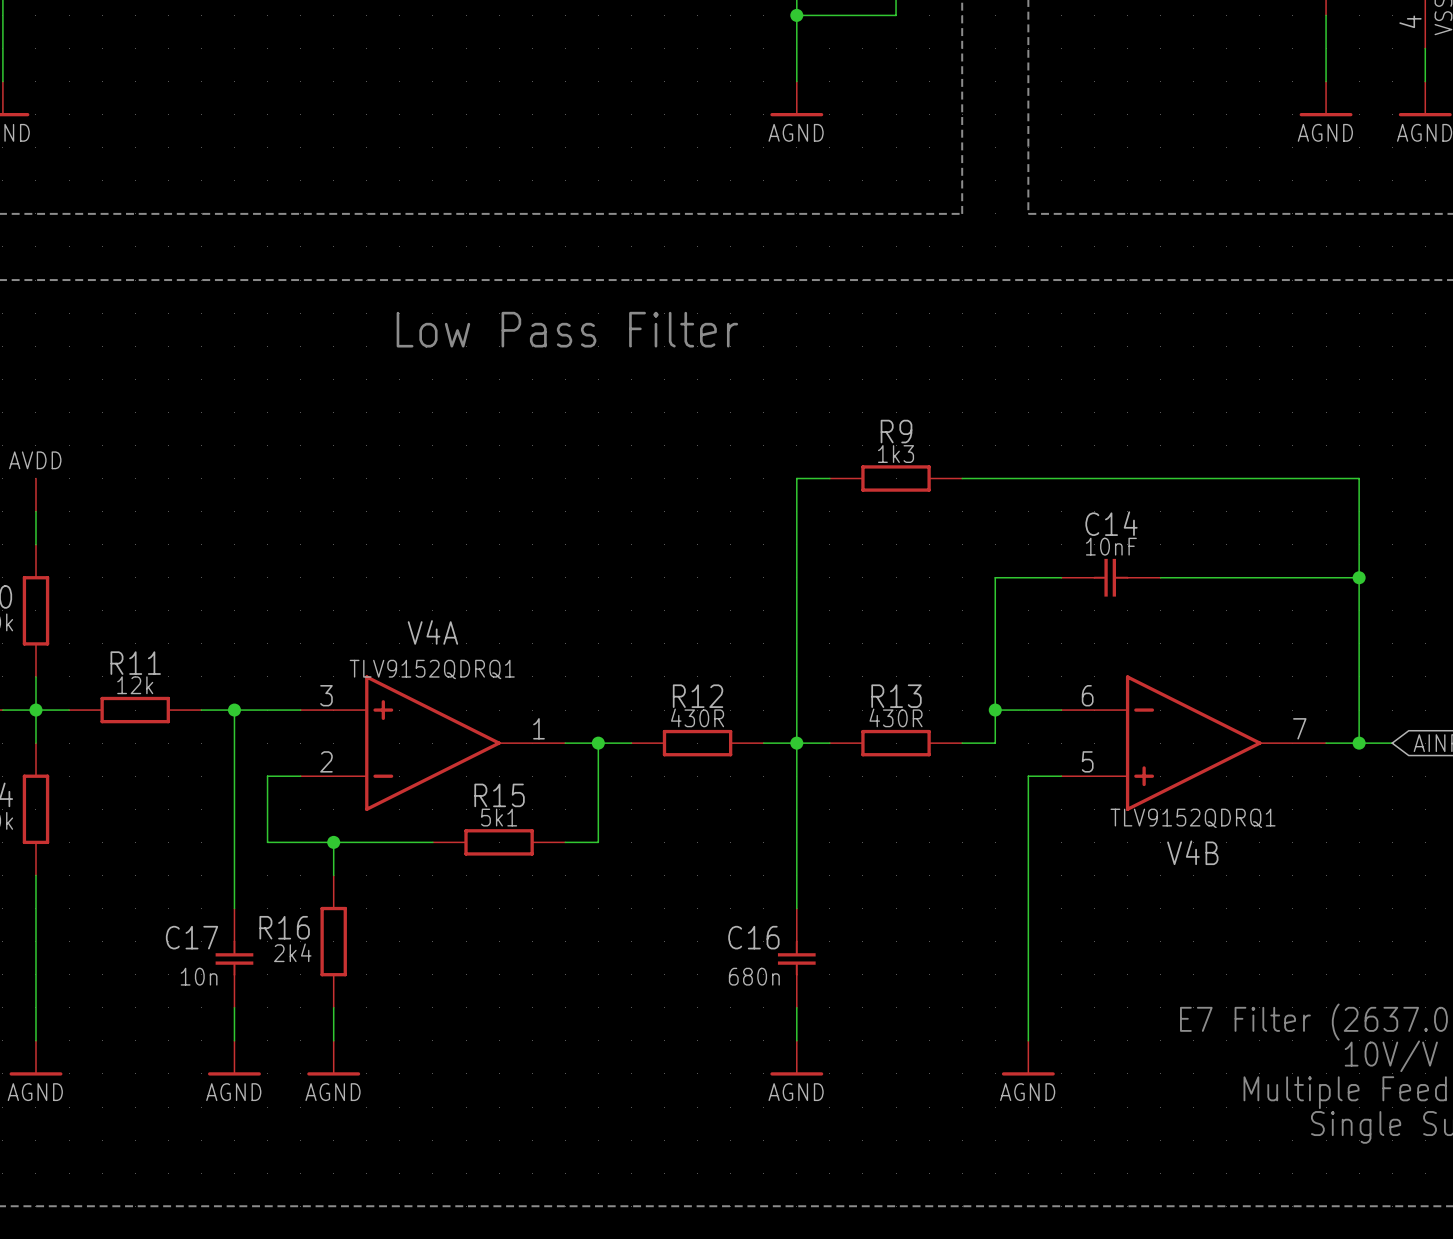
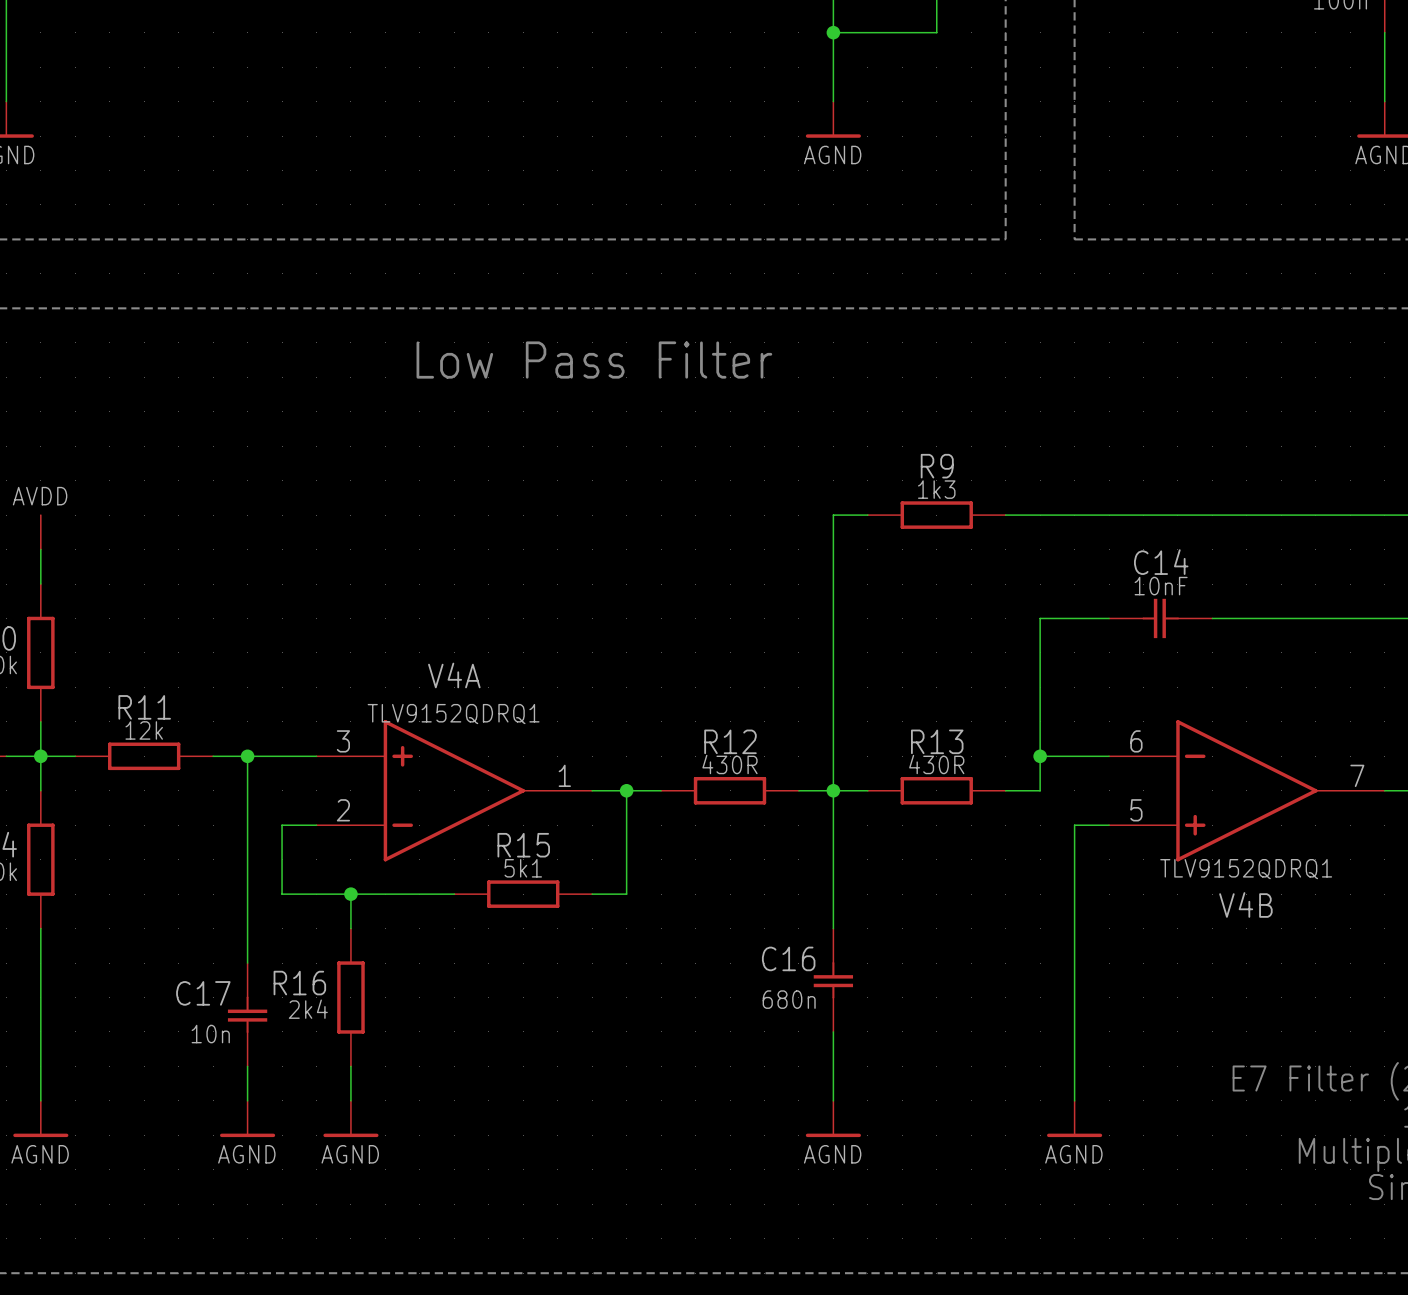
C16 position: (796, 958) -> (833, 980)

